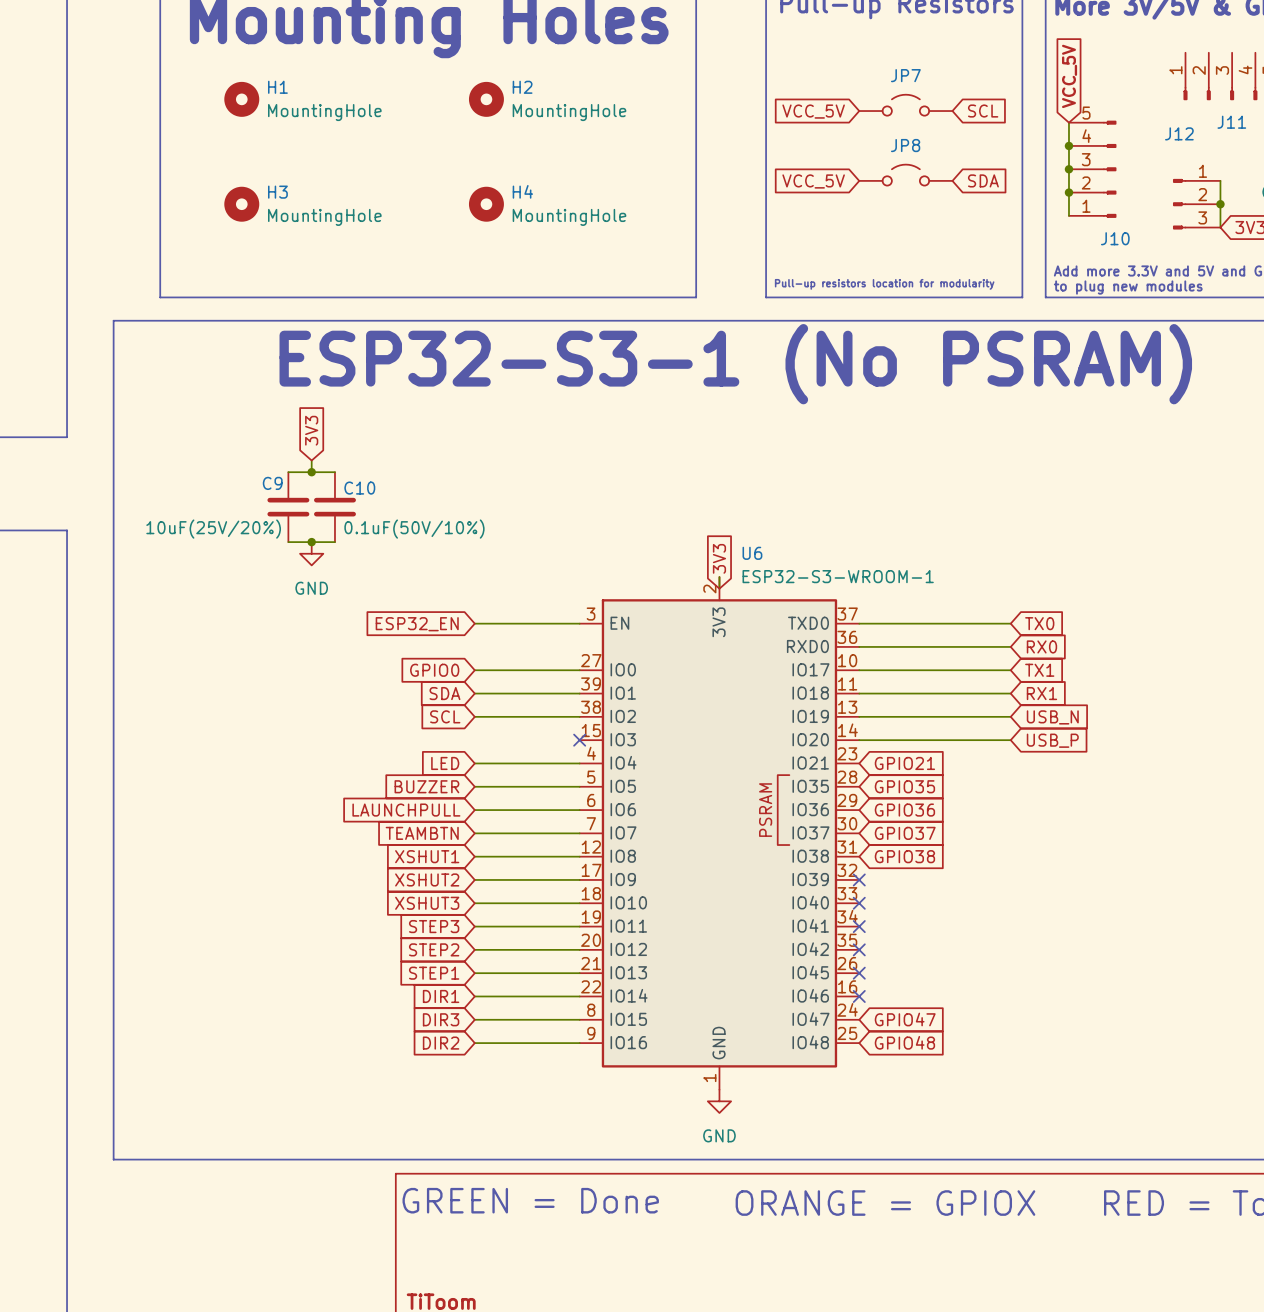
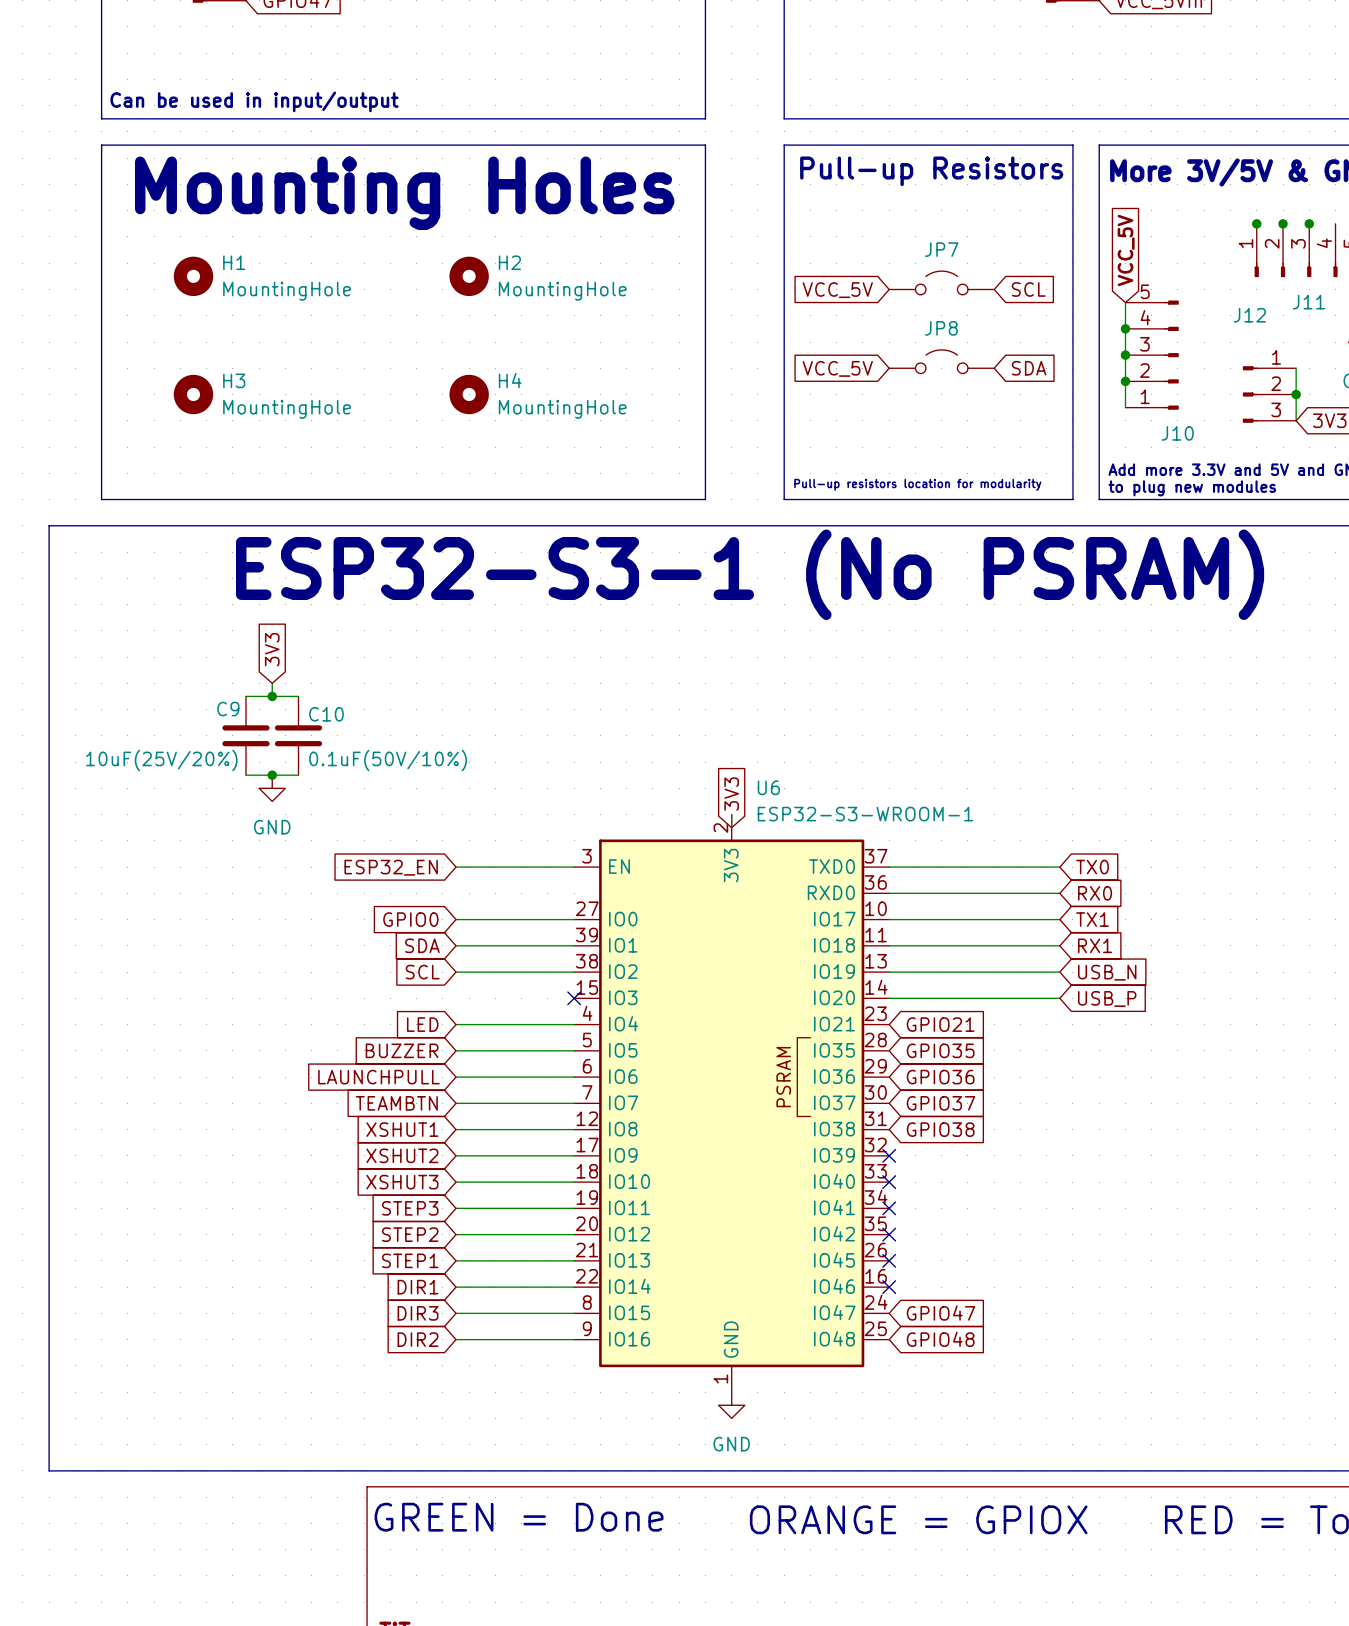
junction: none -> (1256, 223)
junction: none -> (1283, 223)
junction: none -> (1309, 223)

